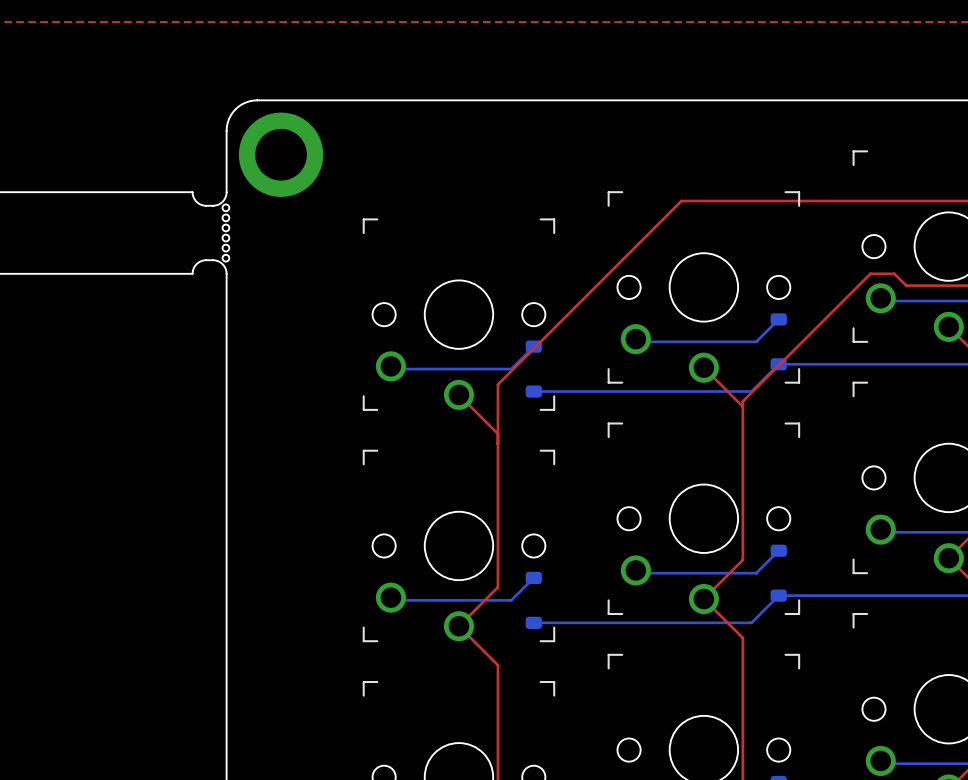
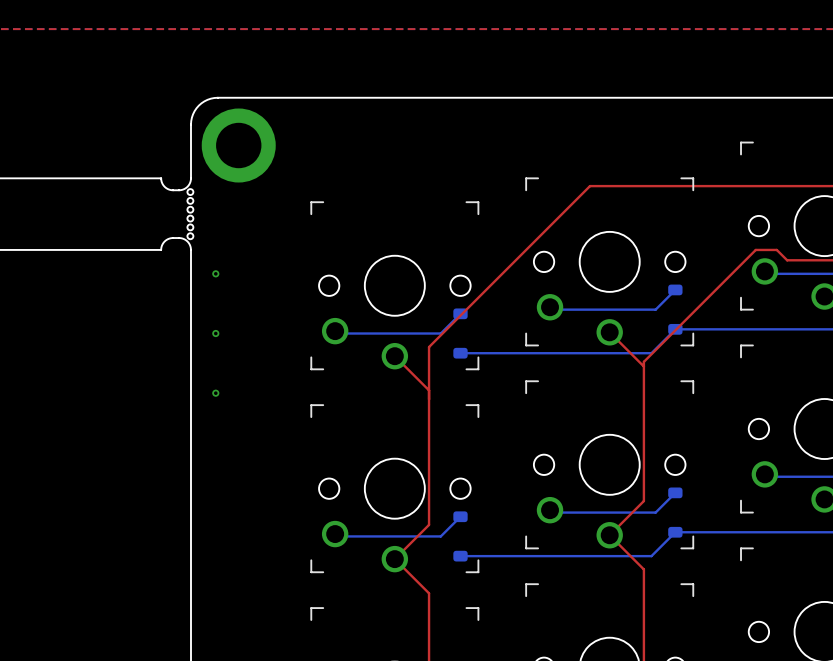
via: none -> (215, 273)
via: none -> (215, 333)
via: none -> (215, 393)

